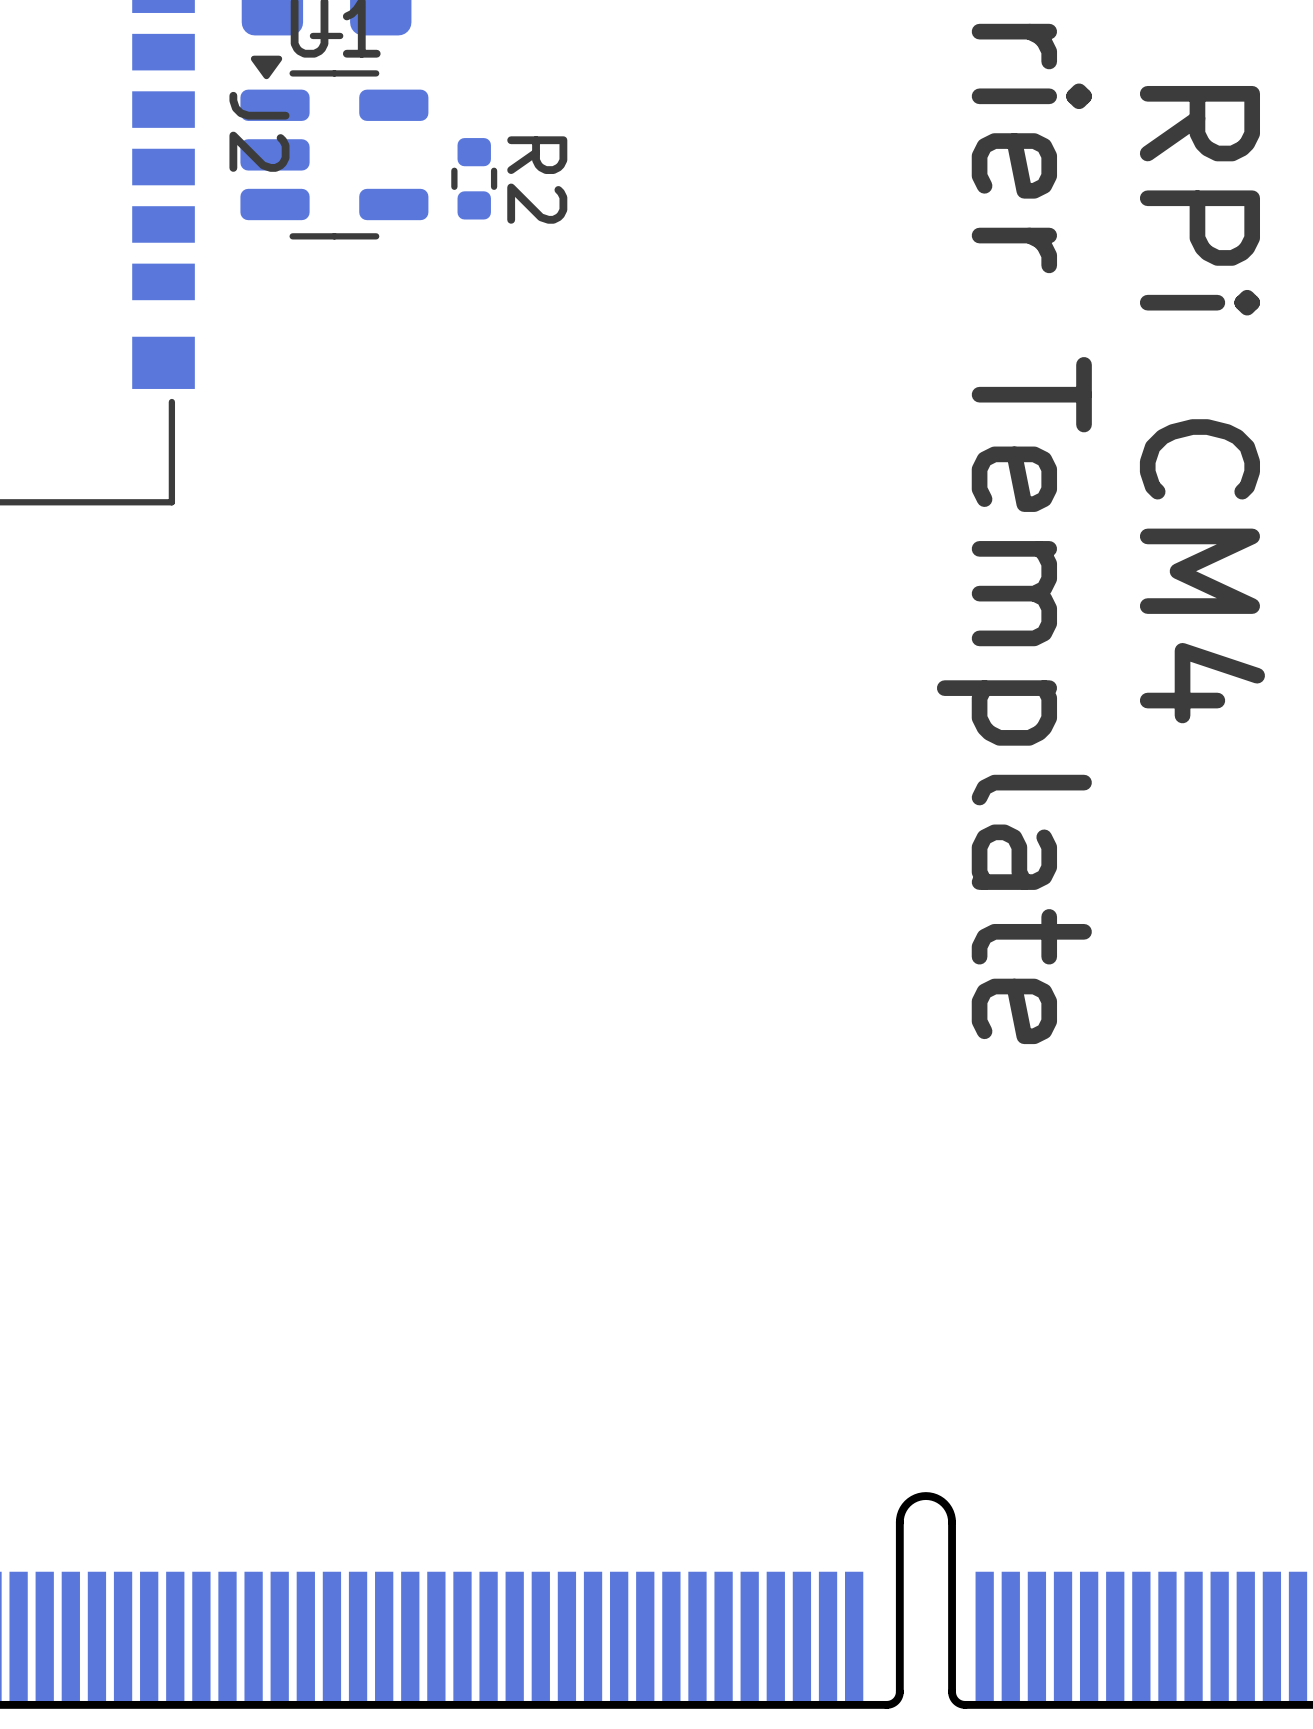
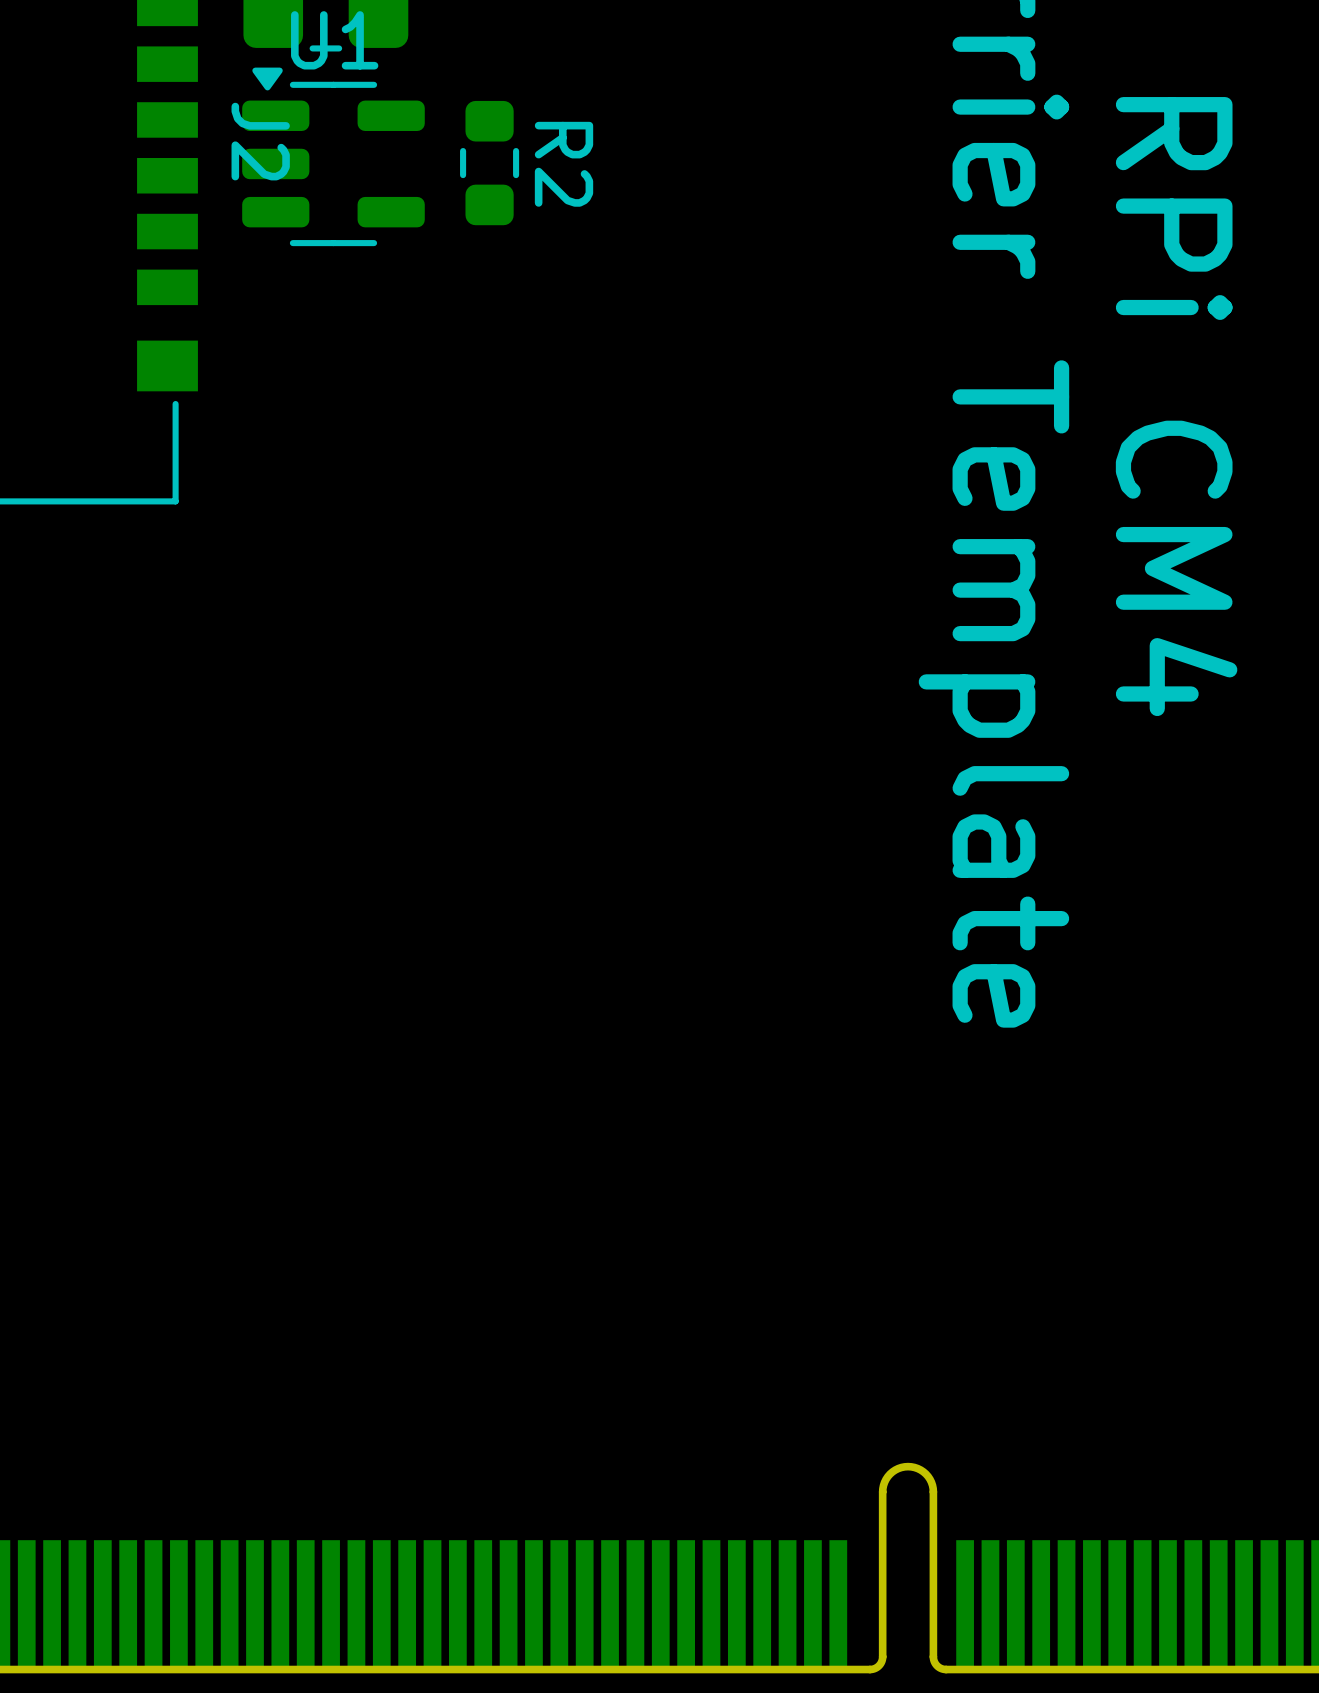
R2 footprint: [451, 138, 498, 220] -> [460, 100, 520, 226]
R2 name position: R2 (537, 180) -> R2 (564, 164)

